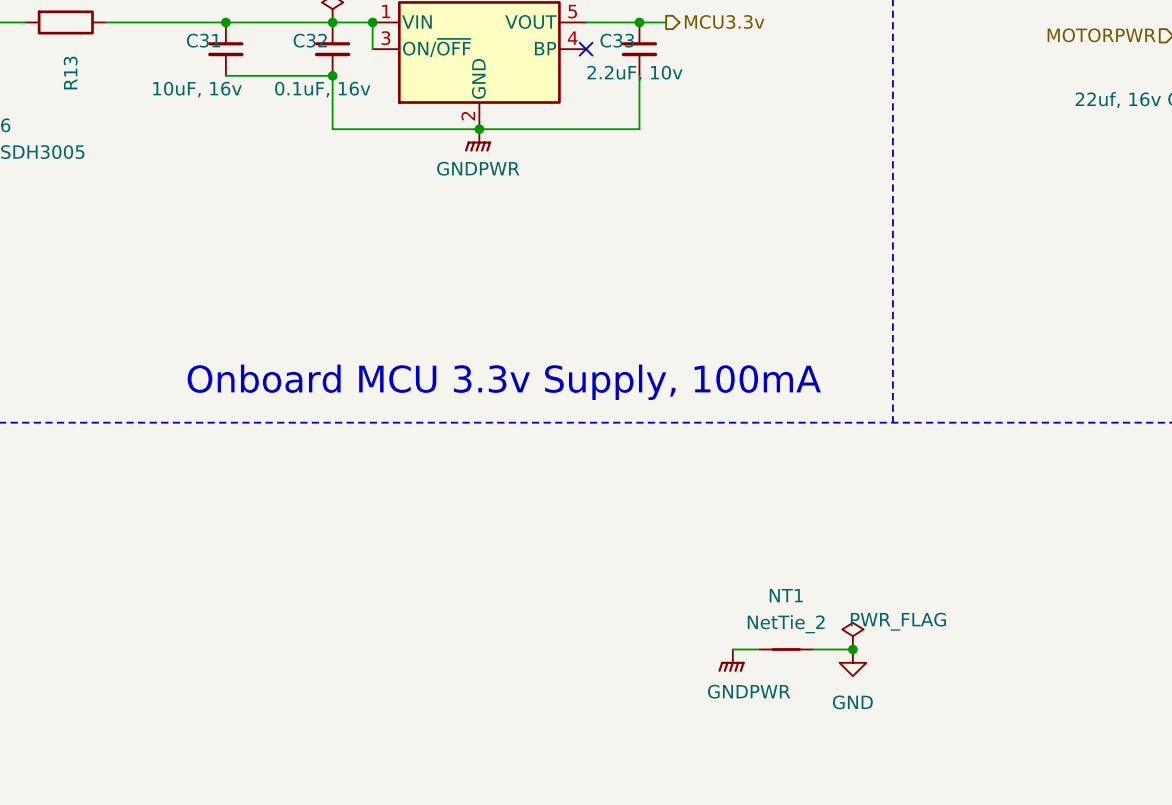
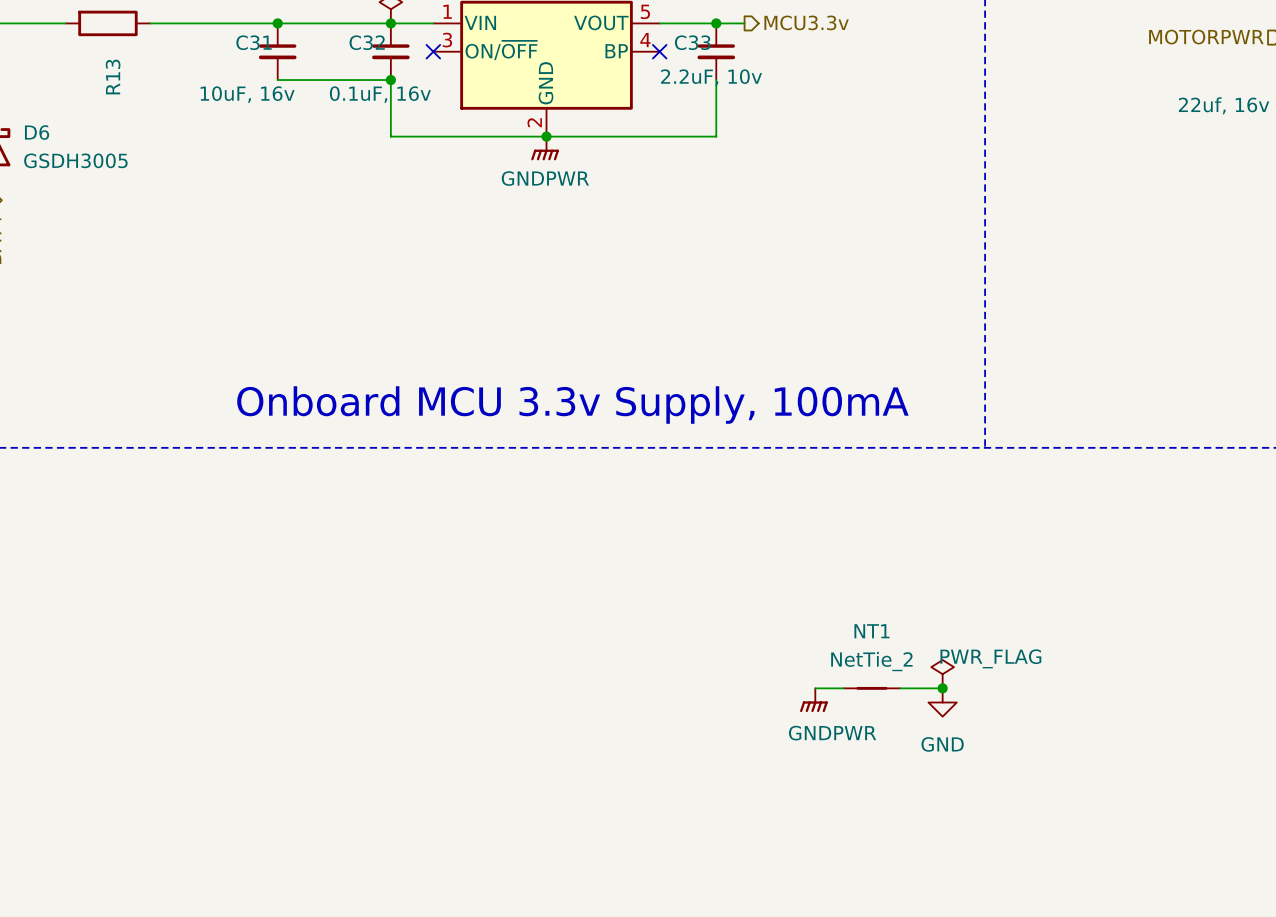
wire: (372, 22) (372, 49) -> none
junction: (372, 22) -> none
no-connect mark: none -> (433, 51)

